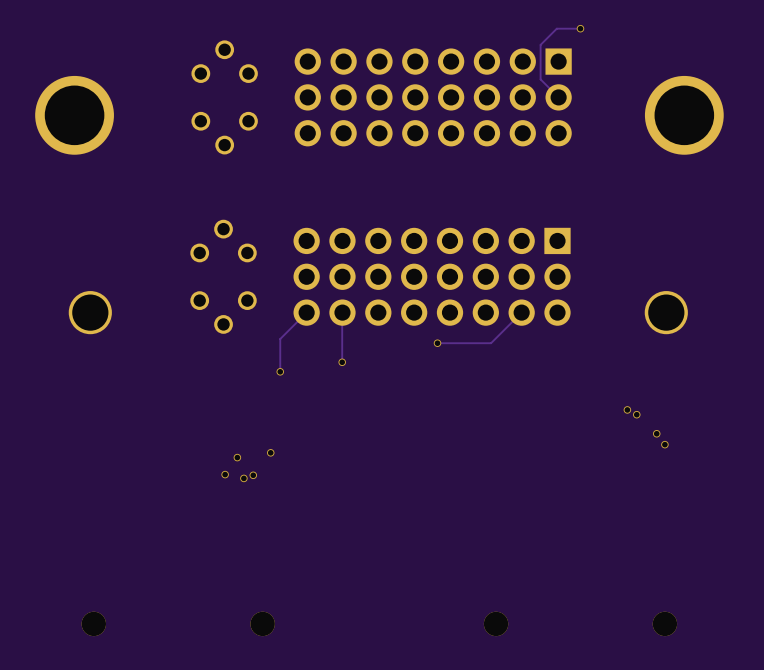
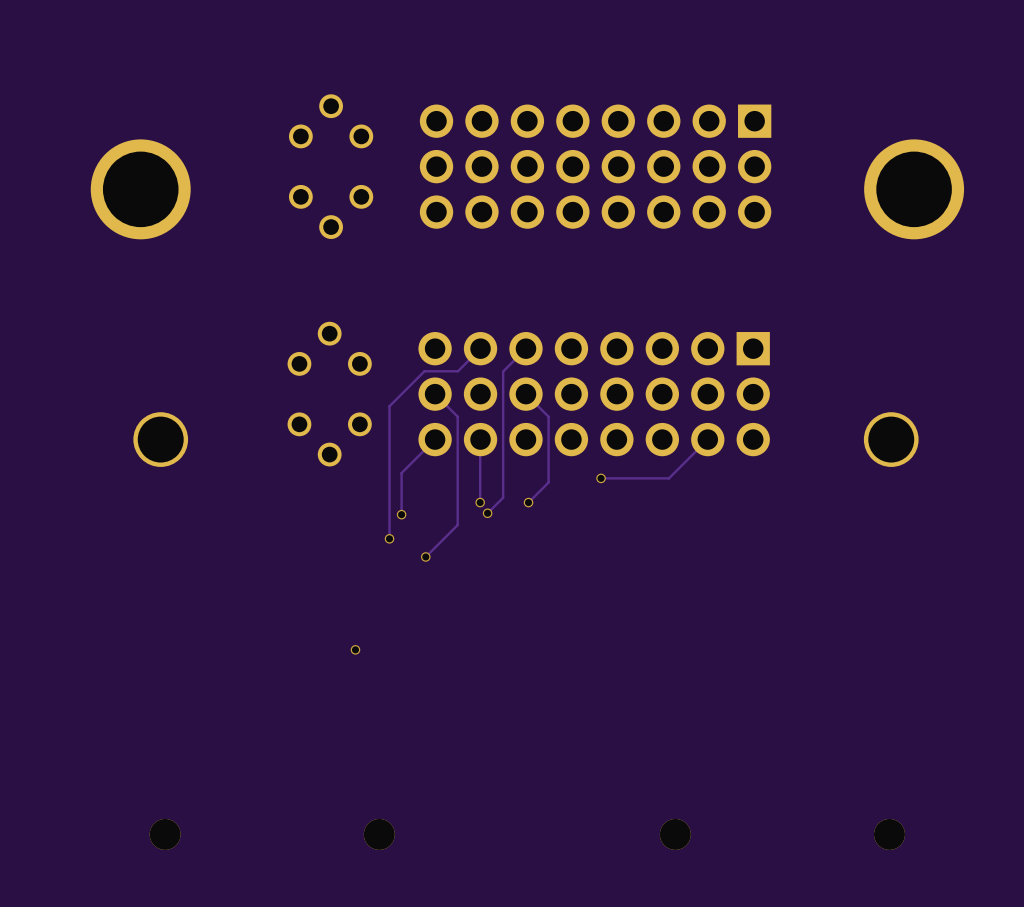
track: (580, 28) (556, 28) (540, 44) (540, 79) (558, 97) -> none
via: (580, 28) -> none
track: none -> (480, 348) (457, 371) (424, 371) (389, 406) (389, 538)
track: none -> (525, 348) (503, 371) (503, 497) (487, 513)
track: none -> (435, 394) (457, 416) (457, 525) (425, 556)
track: none -> (525, 394) (548, 416) (548, 482) (528, 502)
via: none -> (528, 502)
via: none -> (487, 513)
via: none -> (389, 538)
via: none -> (425, 556)
via: (627, 409) -> none
via: (636, 414) -> none
via: (656, 433) -> none
via: (664, 444) -> none
via: (270, 452) -> none
via: (237, 457) -> none
via: (225, 474) -> none
via: (253, 475) -> none

